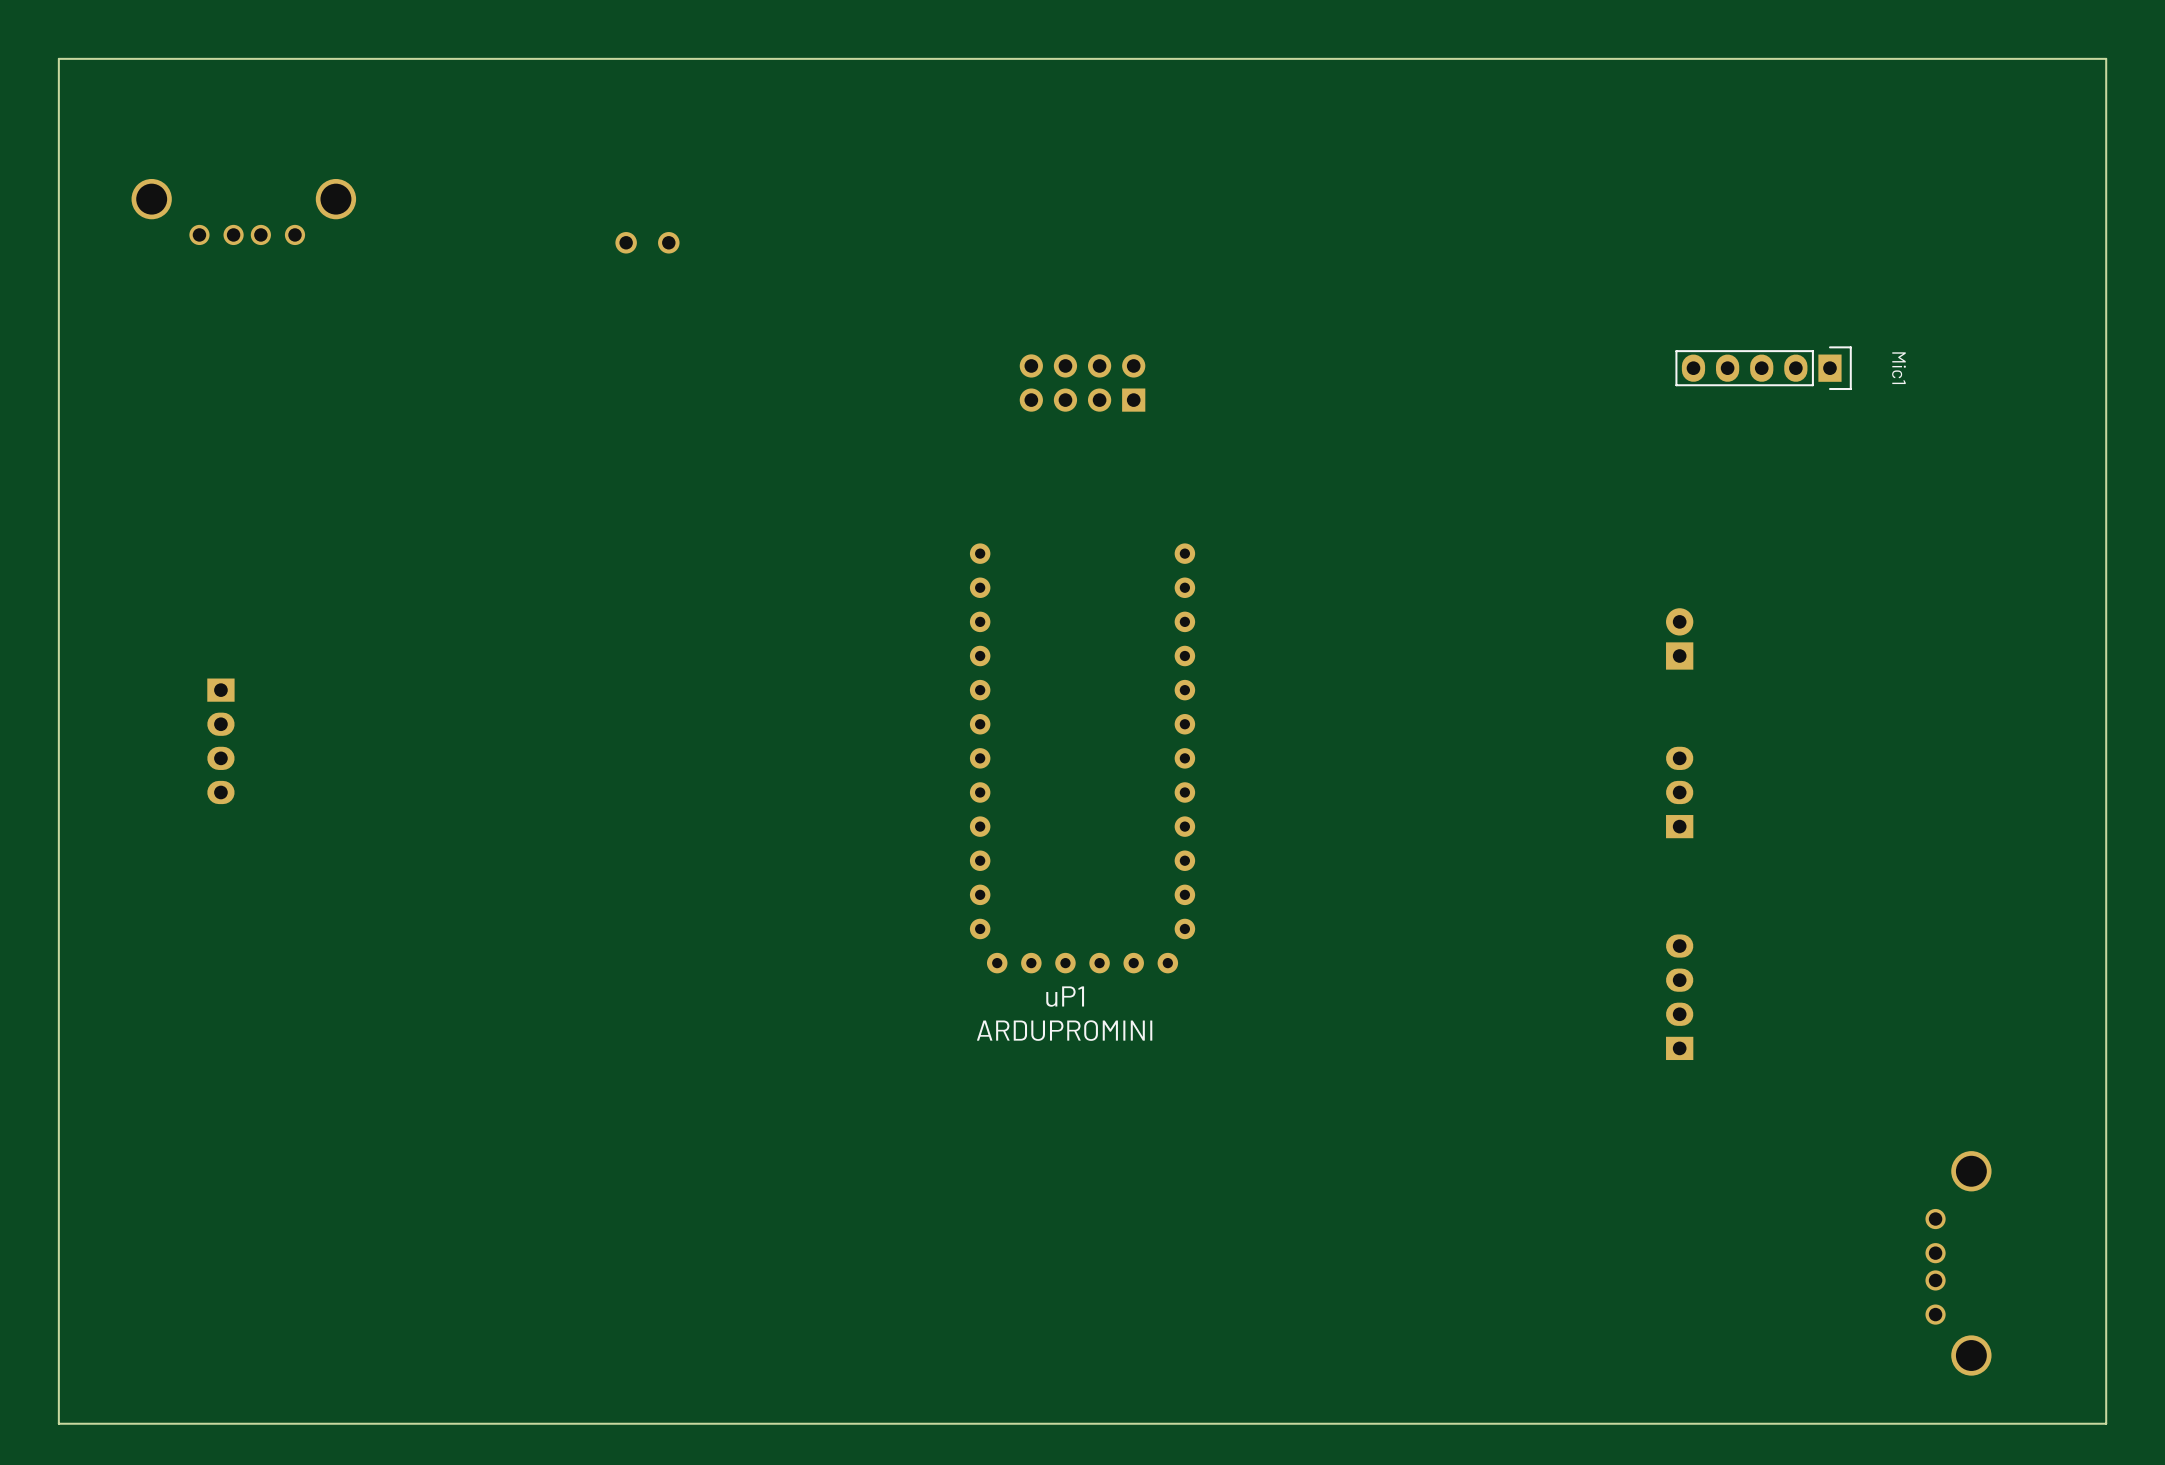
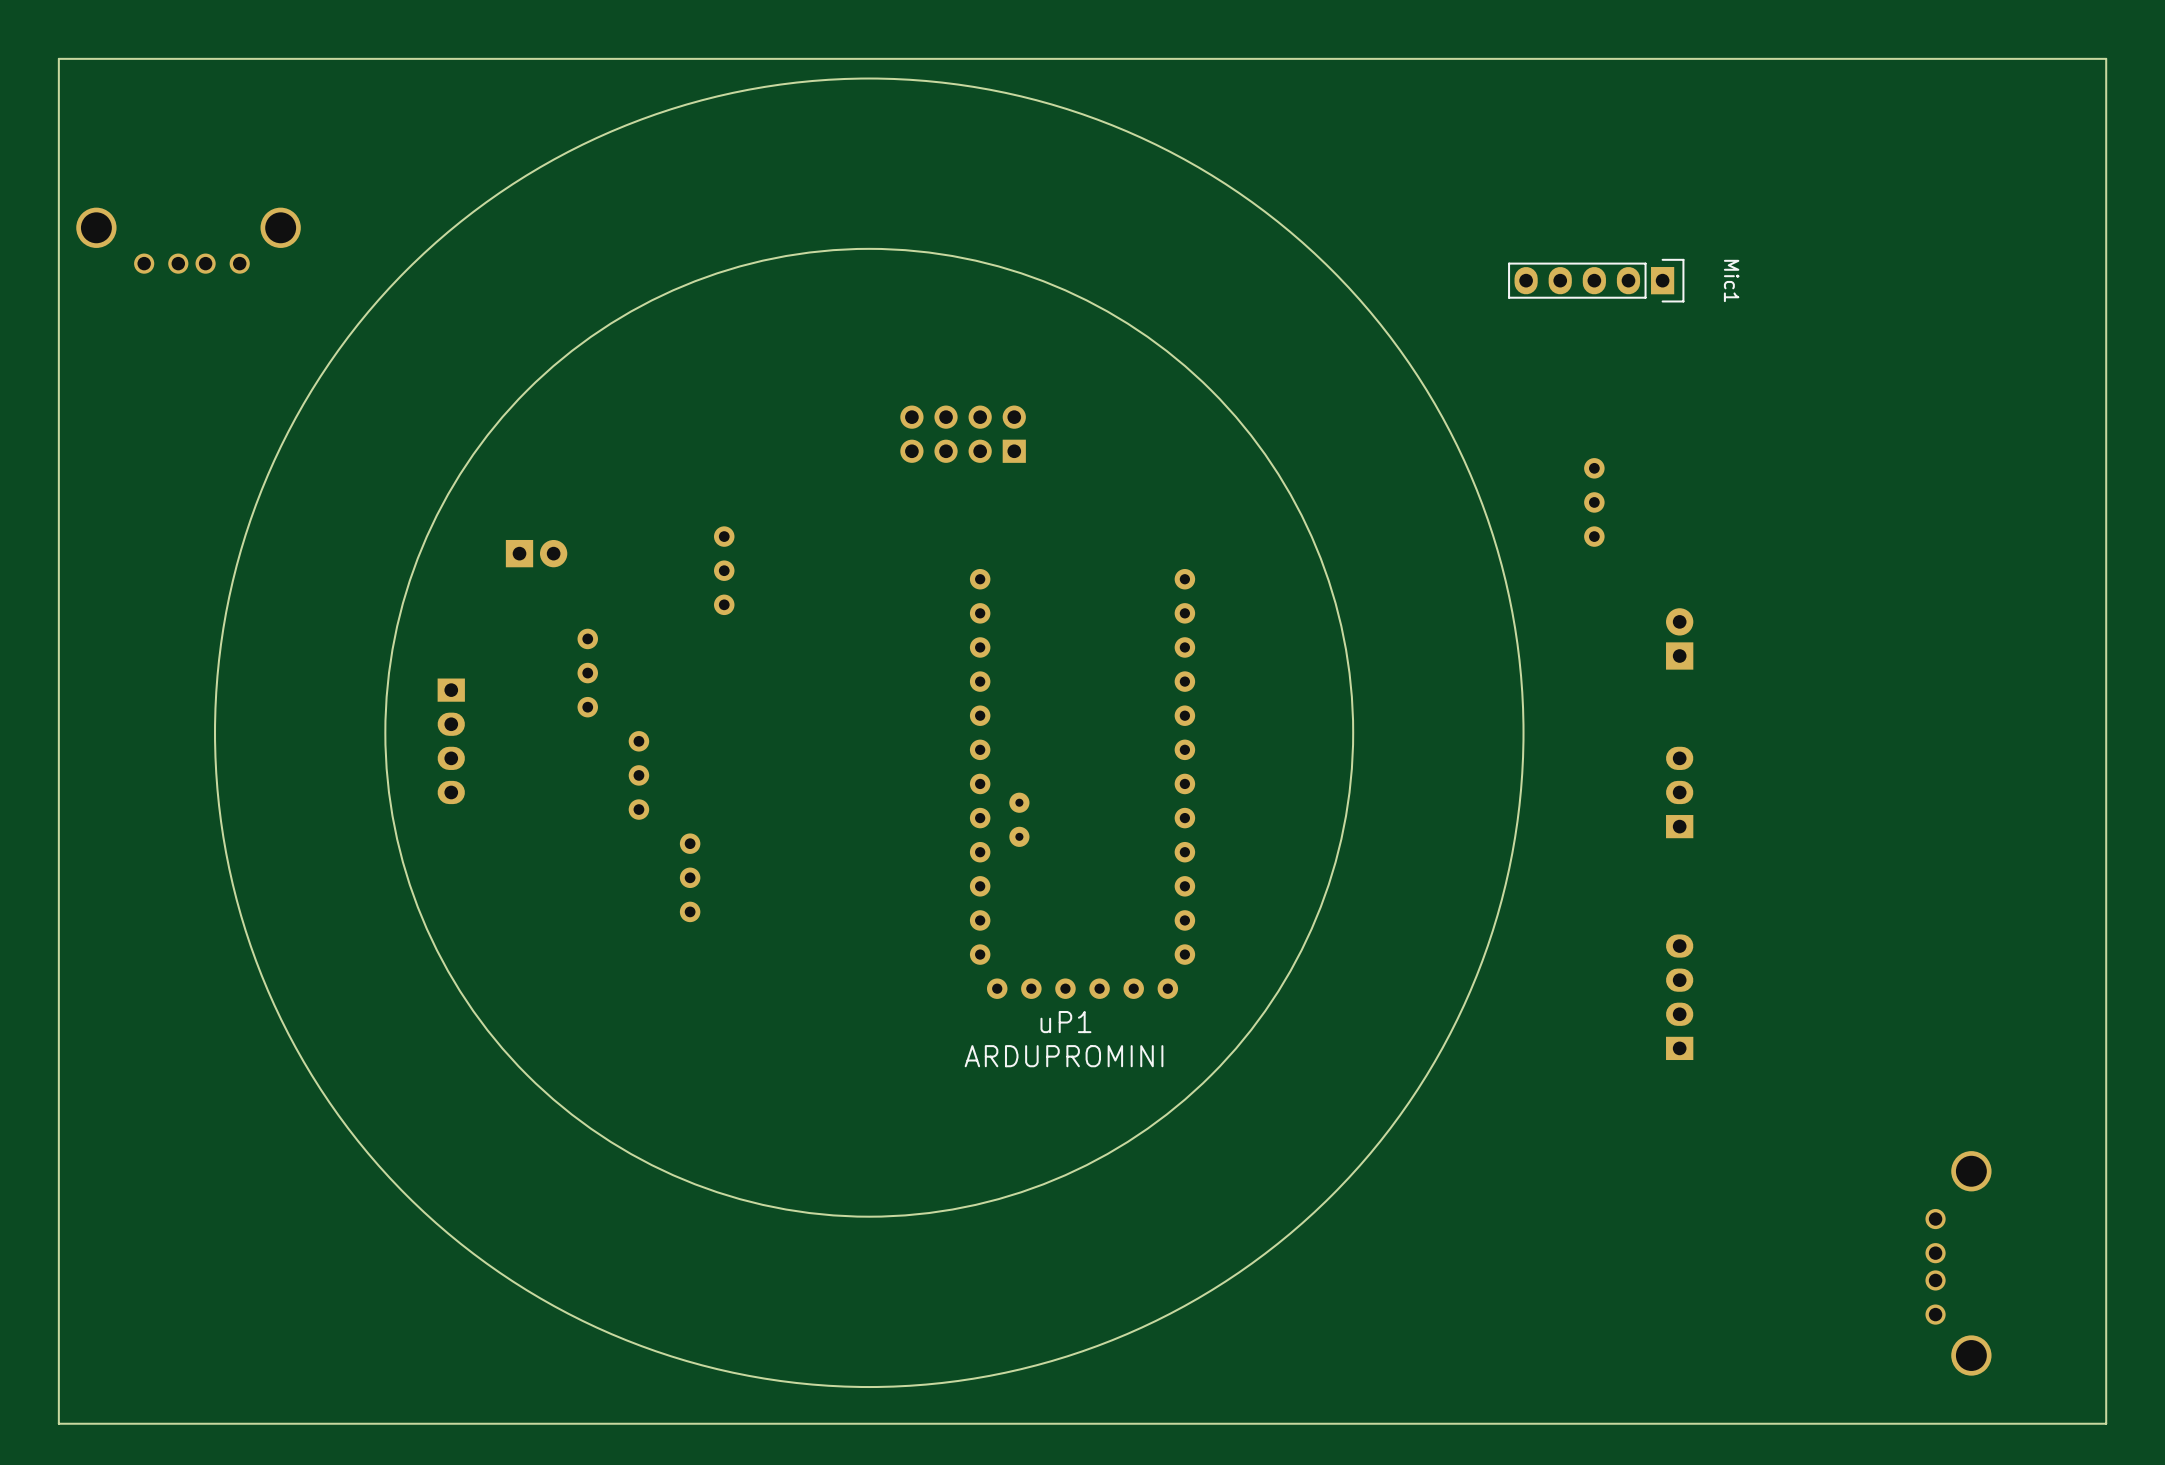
round board edge: none -> [214, 77, 1525, 1389]
part position: (243, 212) -> (188, 240)
part: (647, 242) -> none
round board edge: none -> [384, 247, 1355, 1218]
Mic1 position: (1763, 368) -> (1596, 280)
part position: (1082, 383) -> (963, 434)
part: none -> (1594, 502)
uP1 footprint: [969, 543, 1196, 974] -> [969, 568, 1196, 999]
part: none -> (536, 553)
part: none -> (724, 570)
part: none -> (587, 673)
part position: (220, 741) -> (451, 741)
part: none -> (638, 775)
part: none -> (690, 877)

